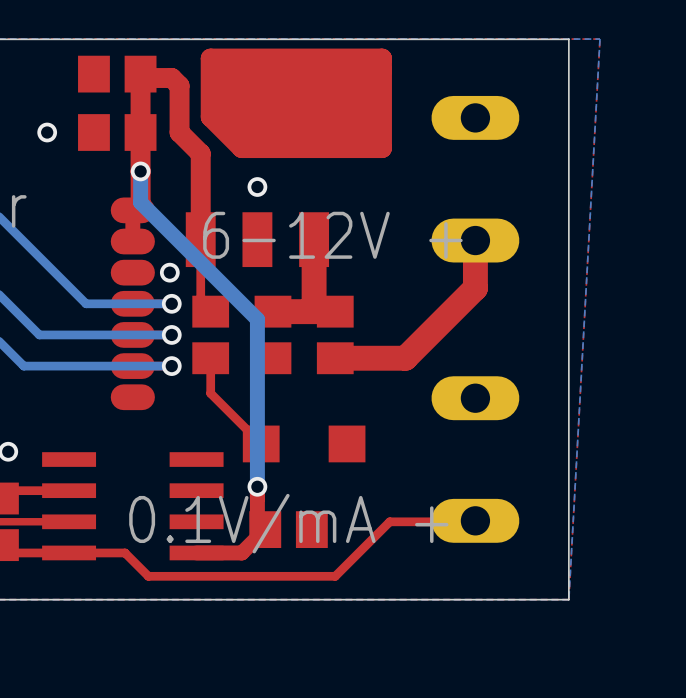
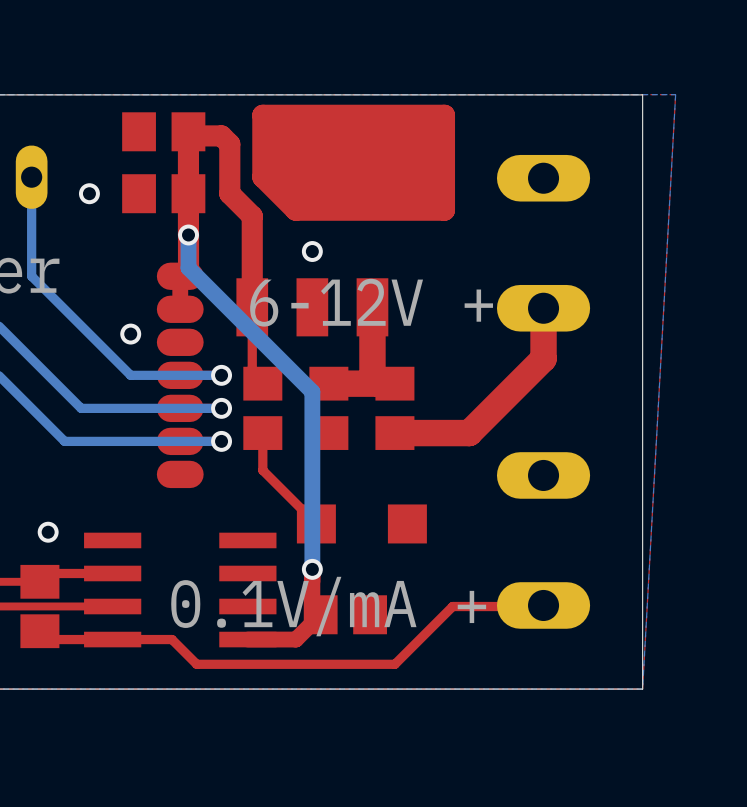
via position: (169, 272) -> (130, 334)

